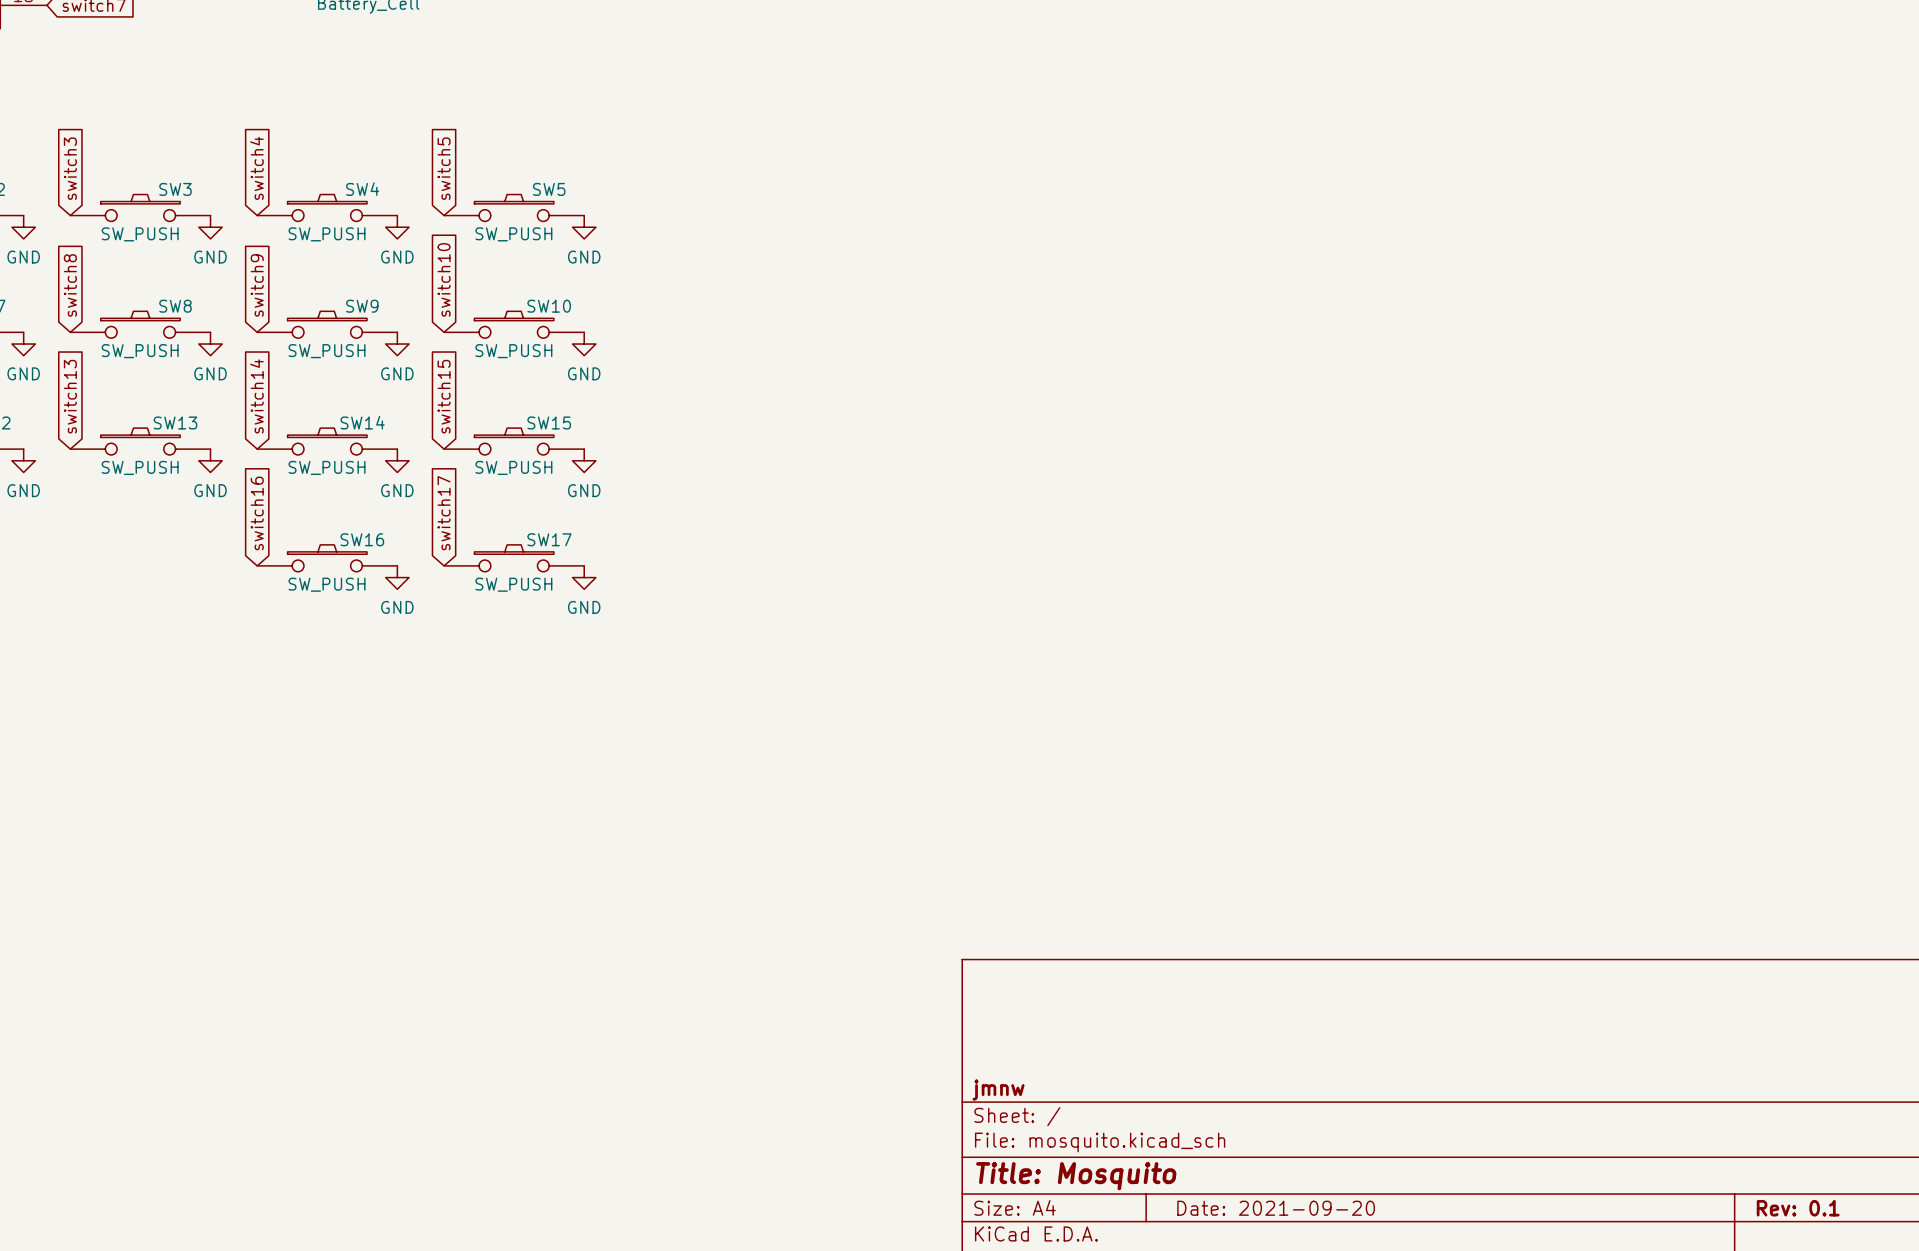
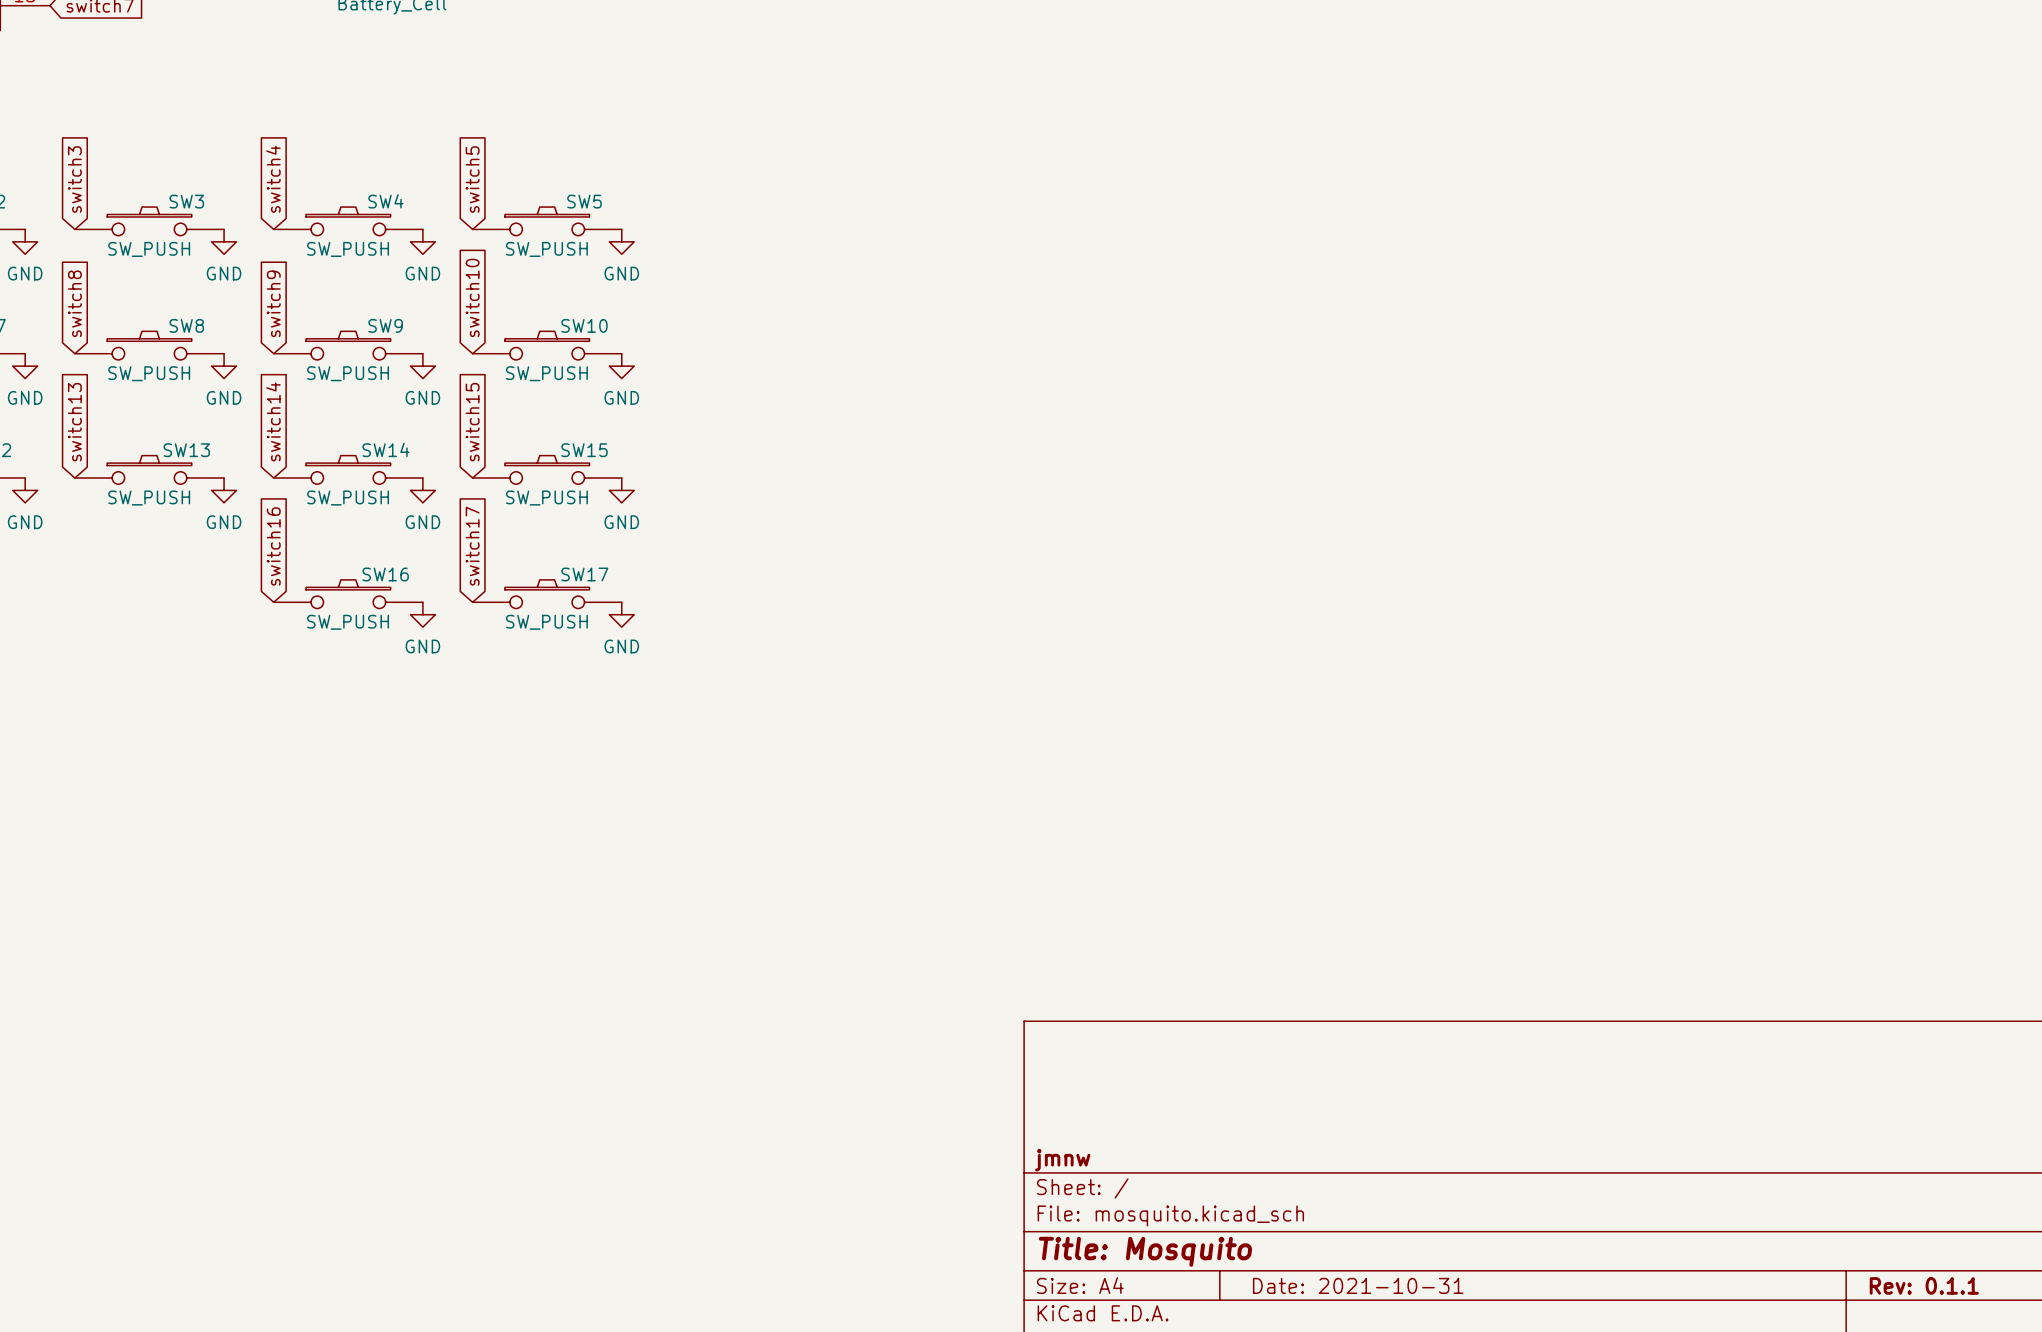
title block: Date: 2021-09-20 (1276, 1208) -> Date: 2021-10-31 (1358, 1285)
title block: Rev: 0.1 (1798, 1208) -> Rev: 0.1.1 (1924, 1285)

